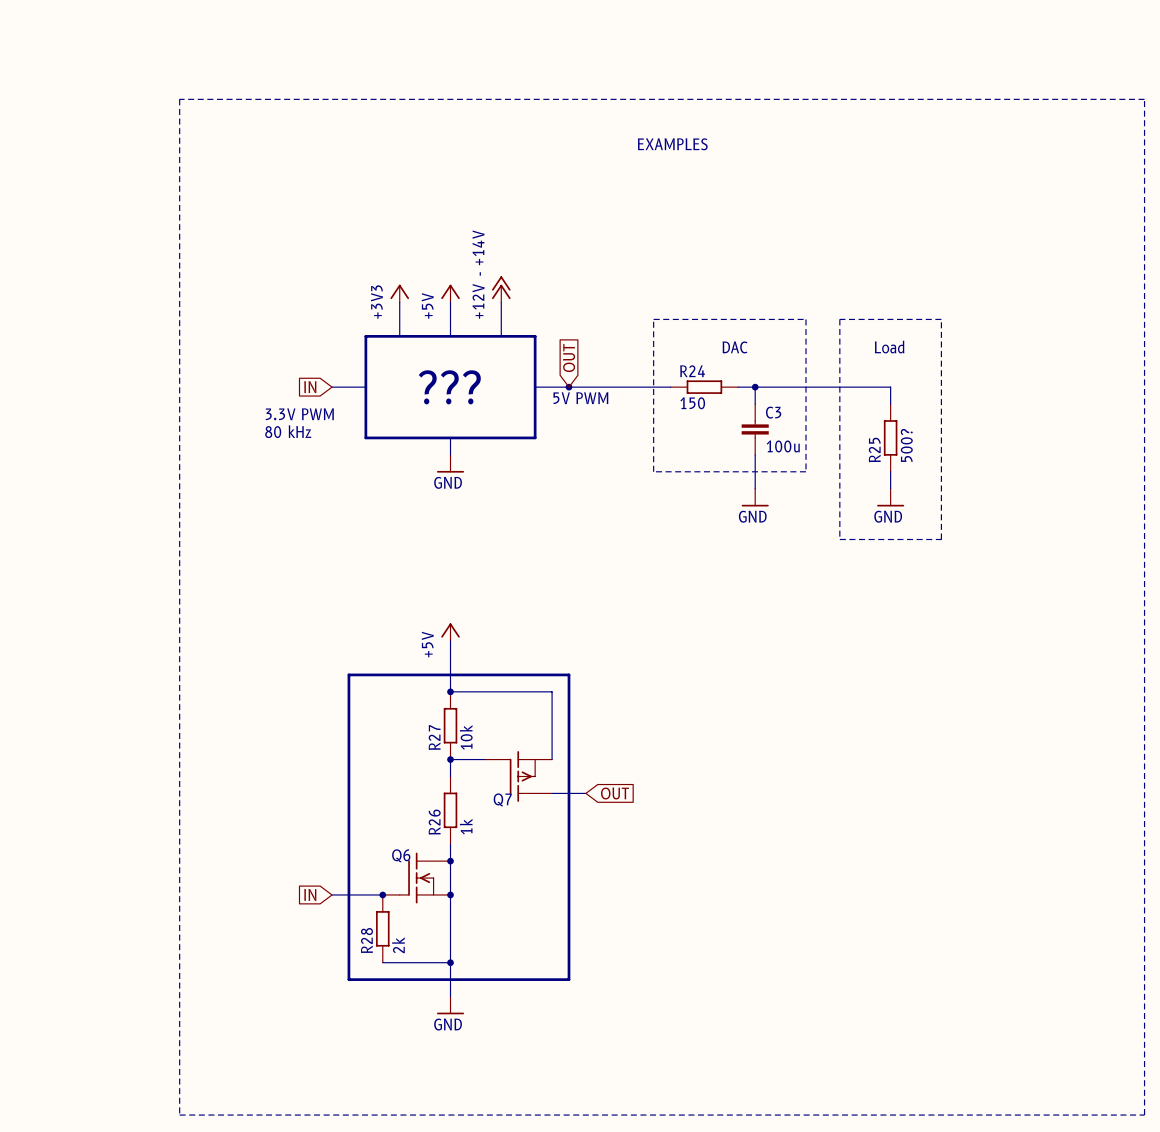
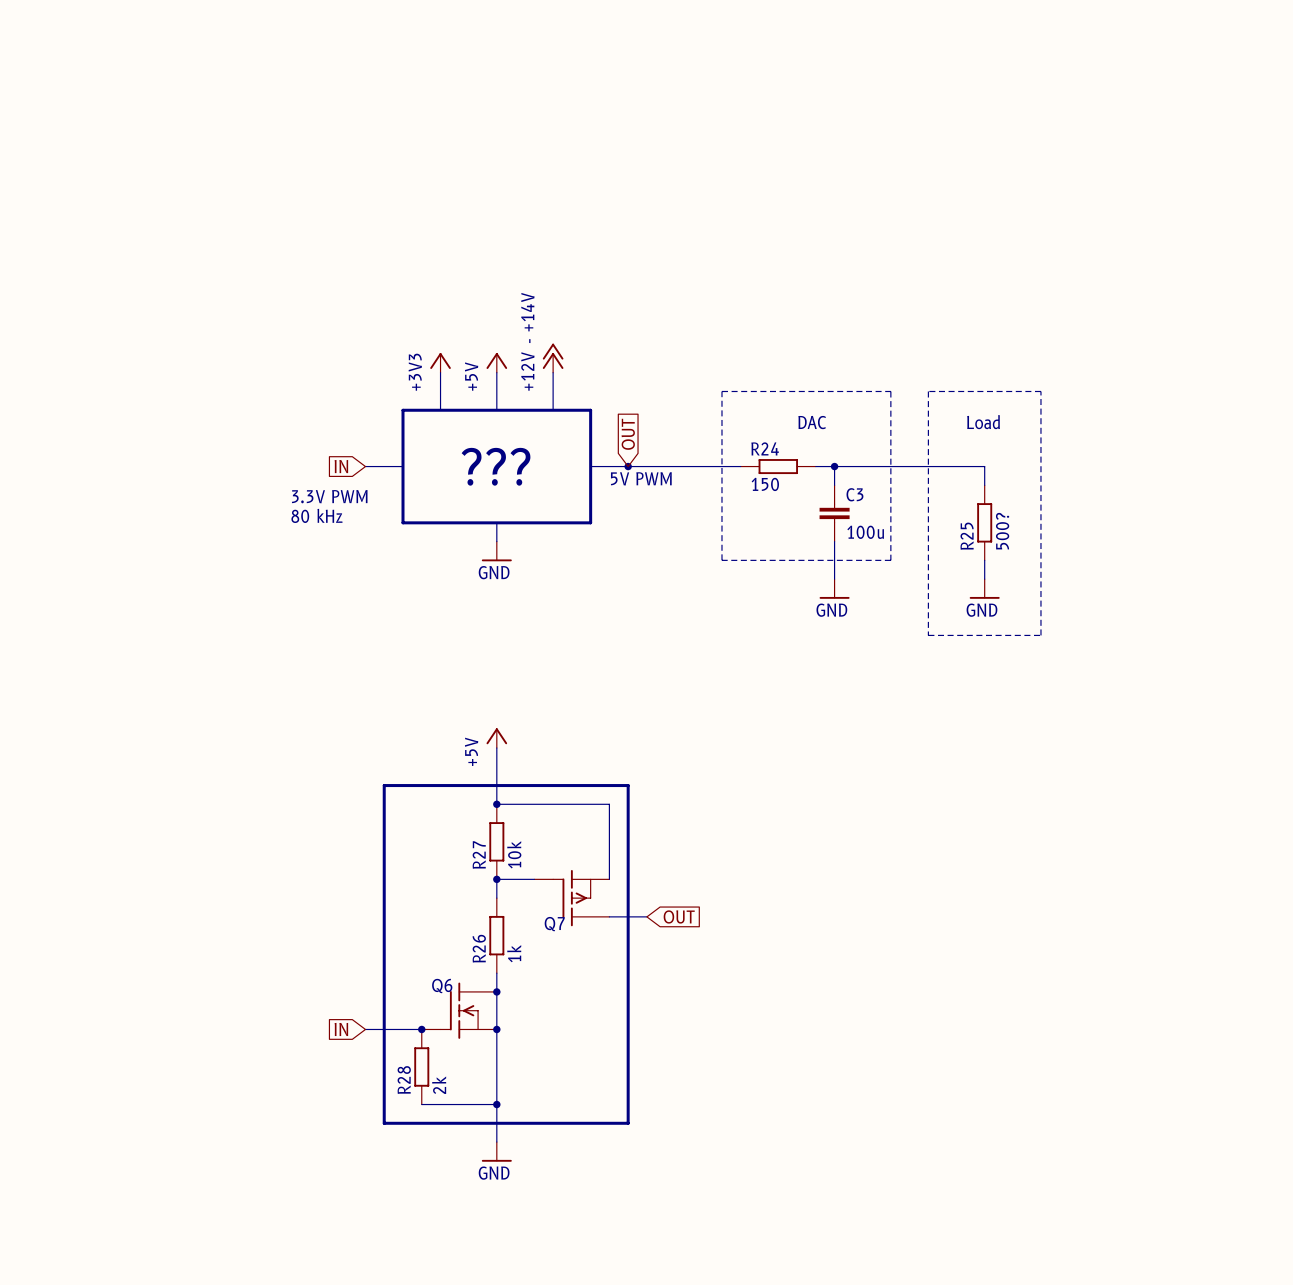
line: (179, 99) (179, 1115) (1144, 1115) (1144, 99) (179, 99) -> none
text: EXAMPLES (672, 144) -> none

